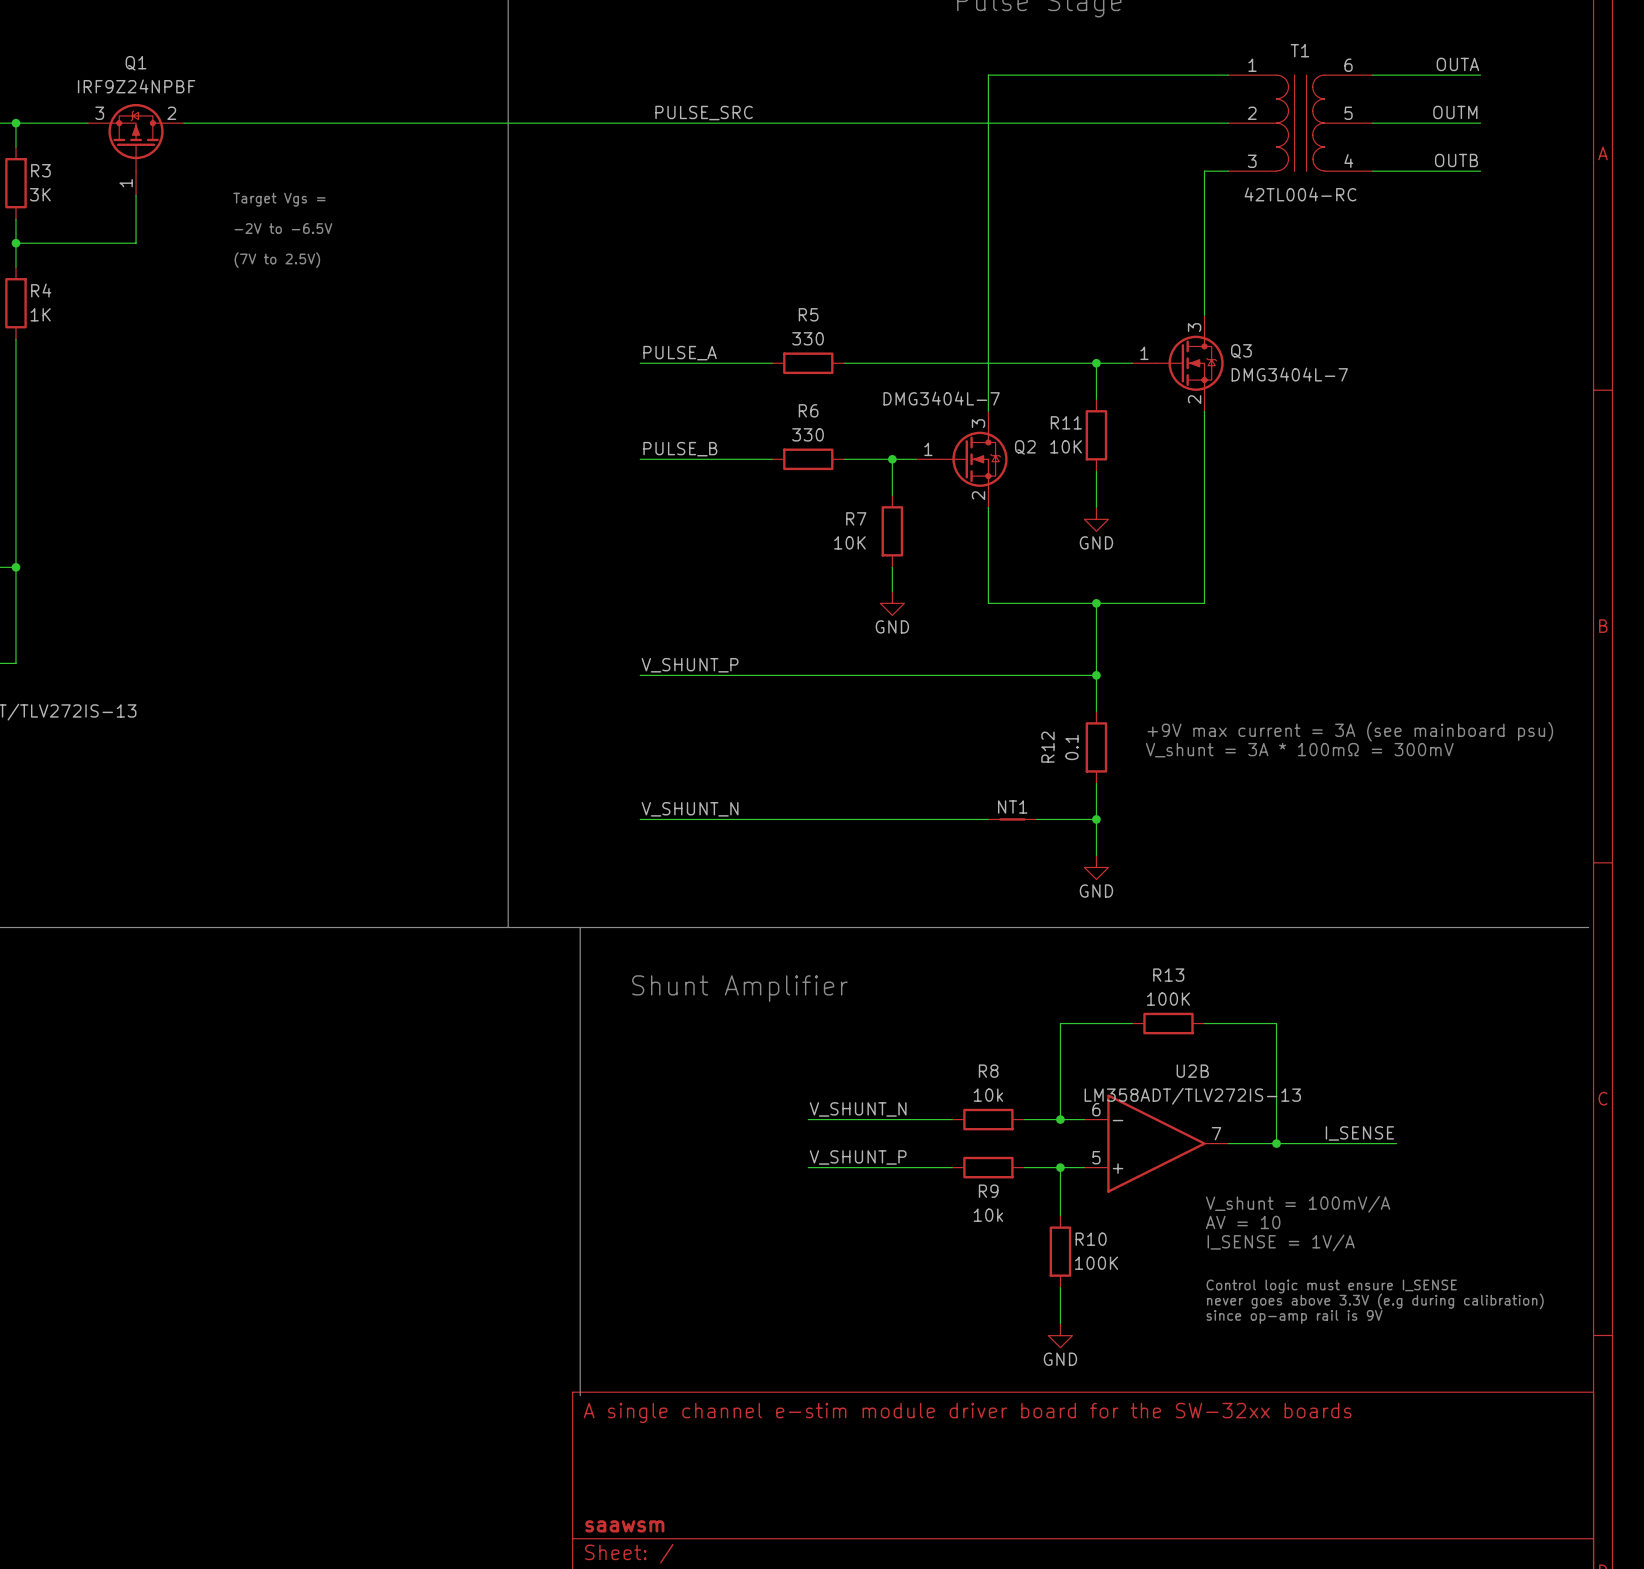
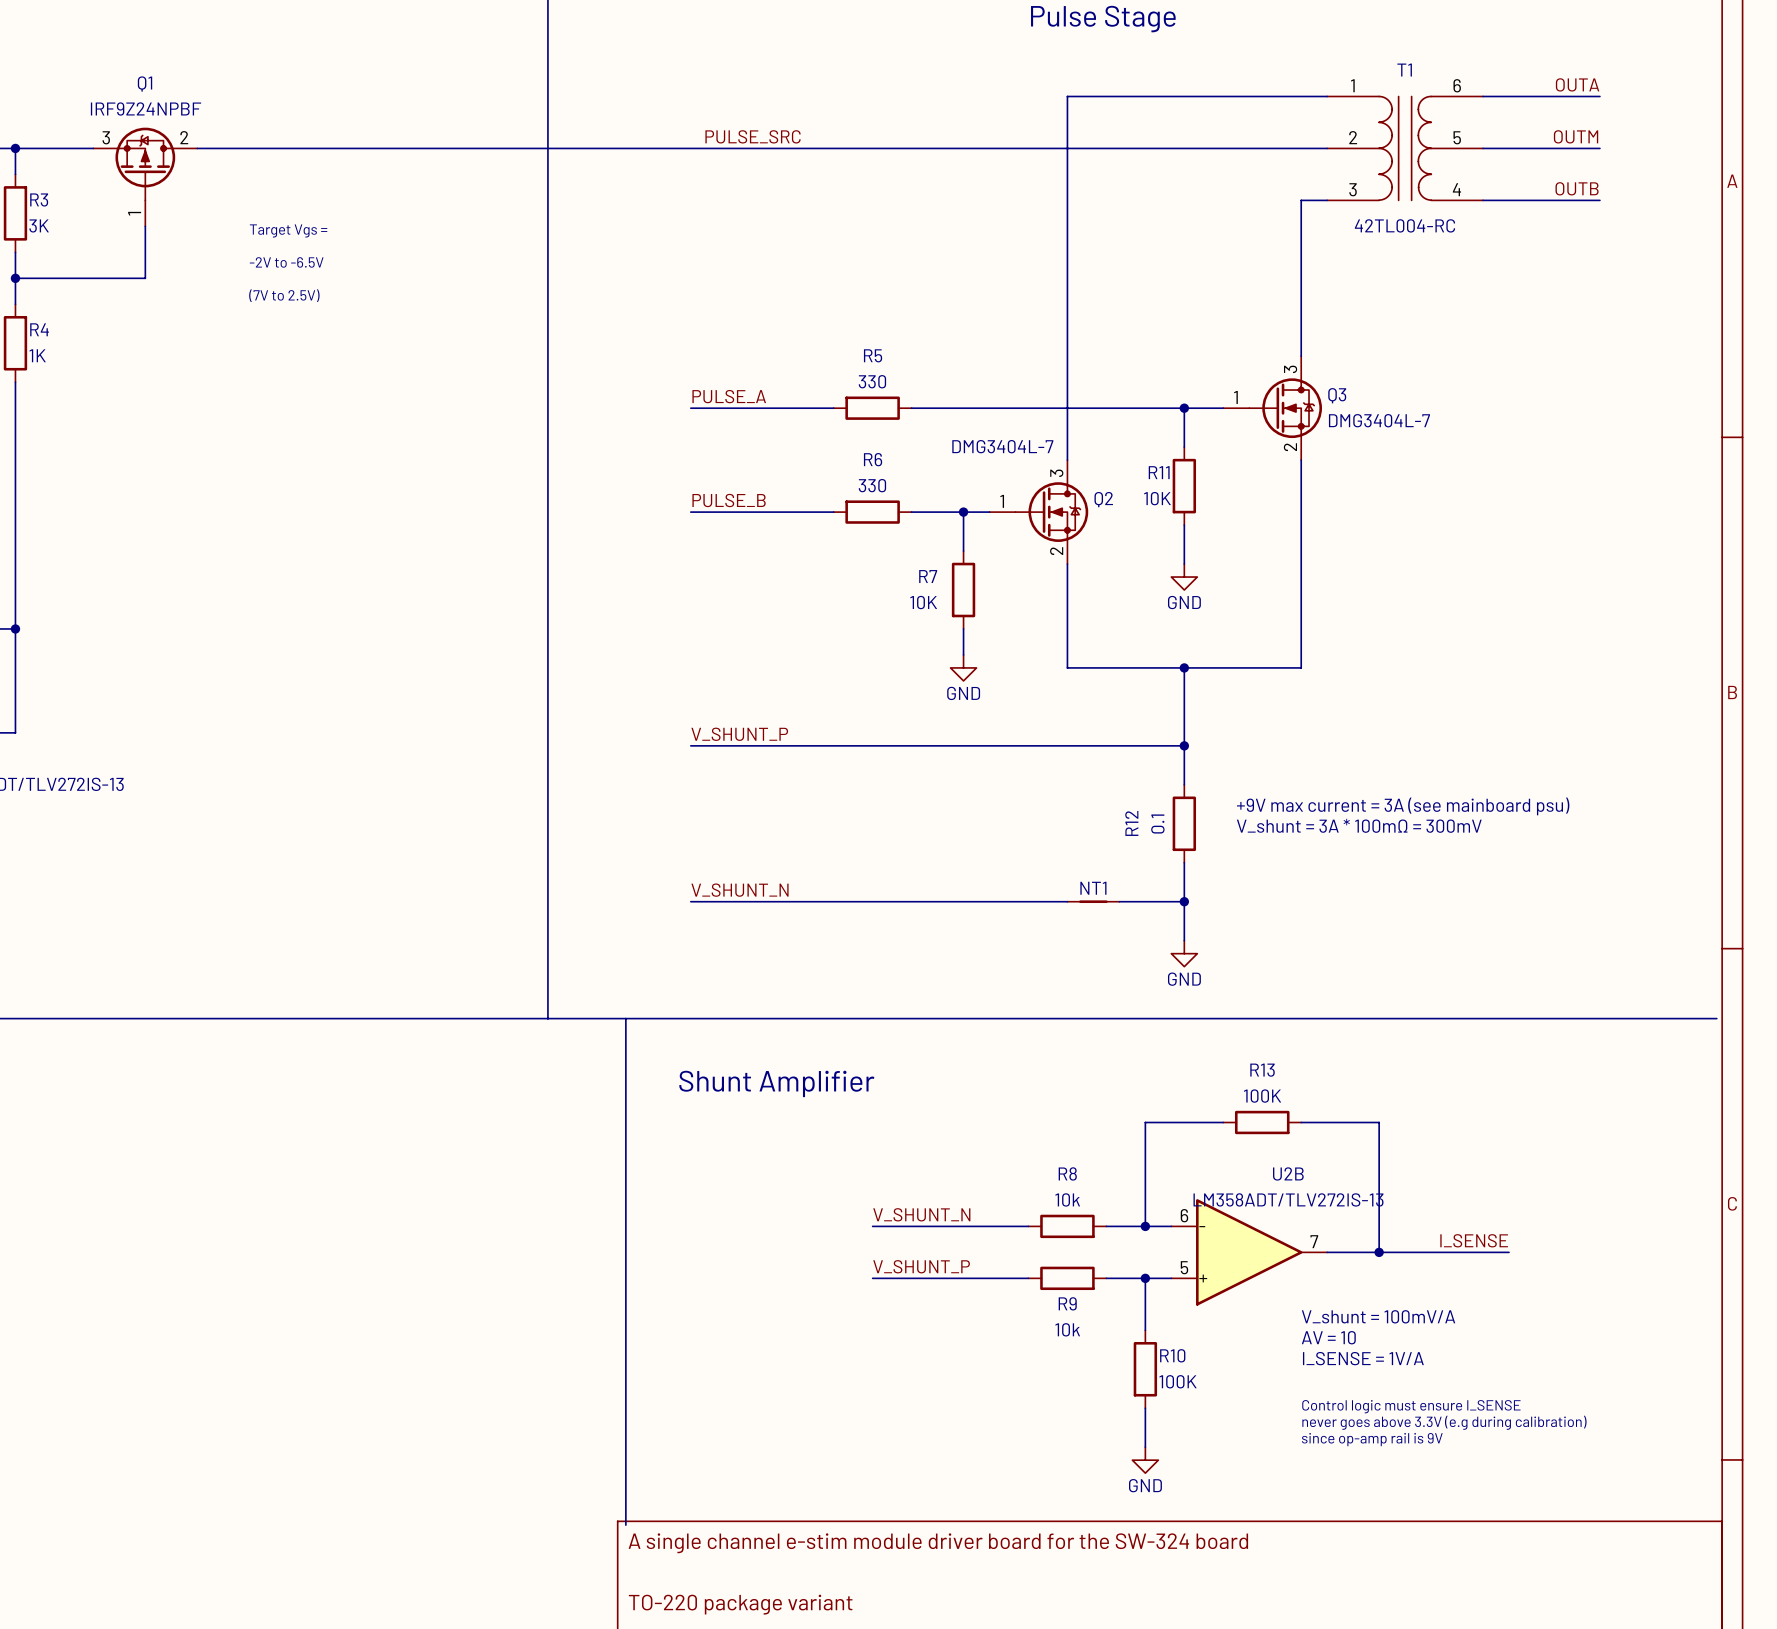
title block: A single channel e-stim module driver board for the SW-32xx boards (967, 1412) -> A single channel e-stim module driver board for the SW-324 board (938, 1543)
title block: none -> TO-220 package variant (740, 1604)

